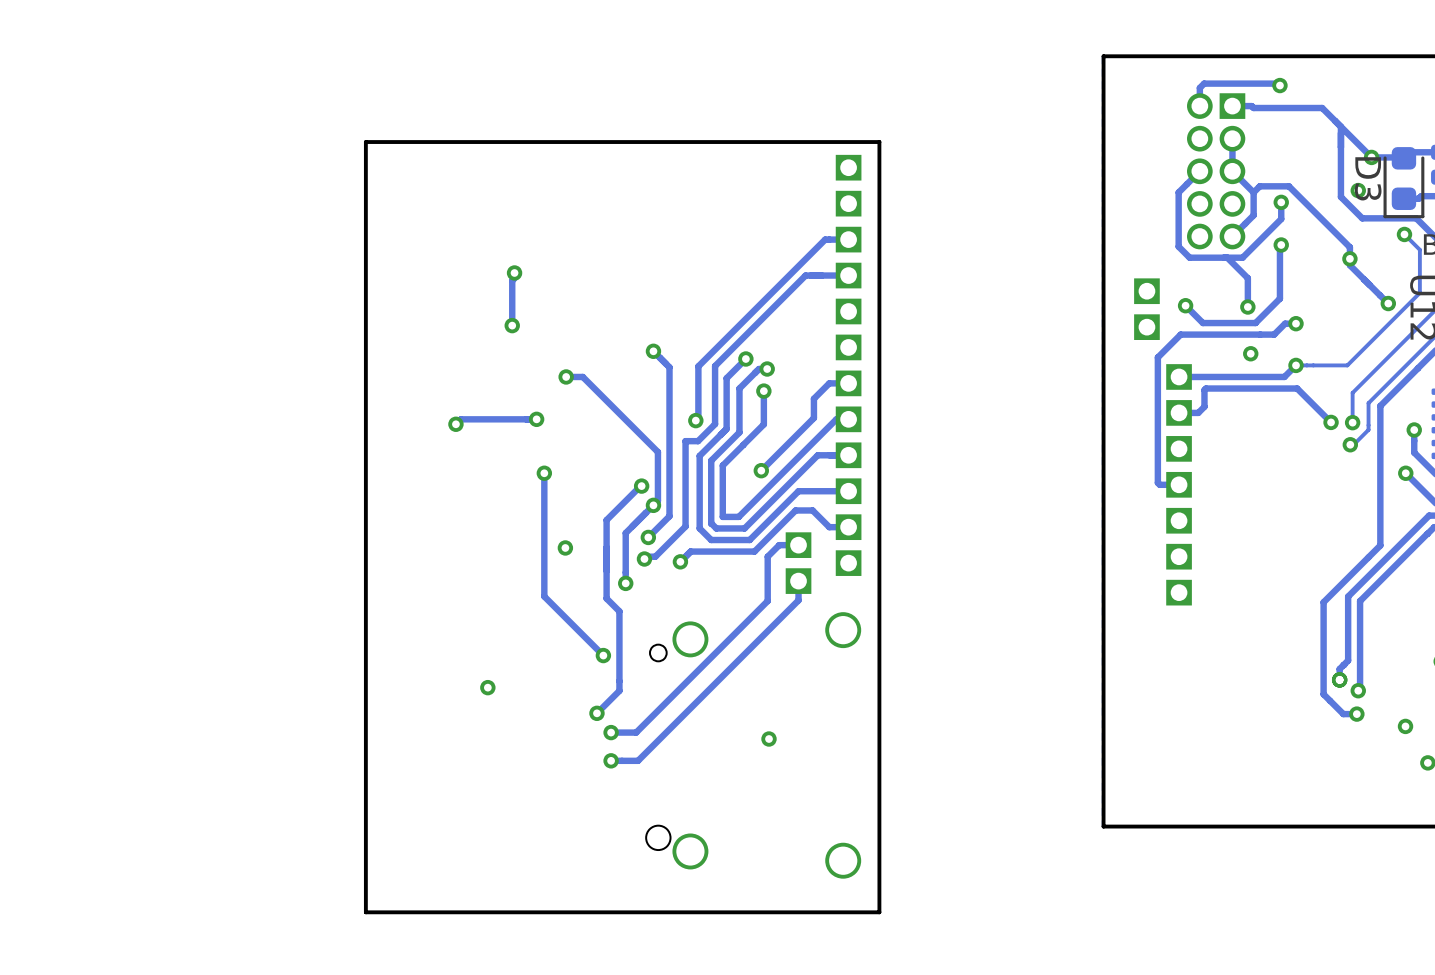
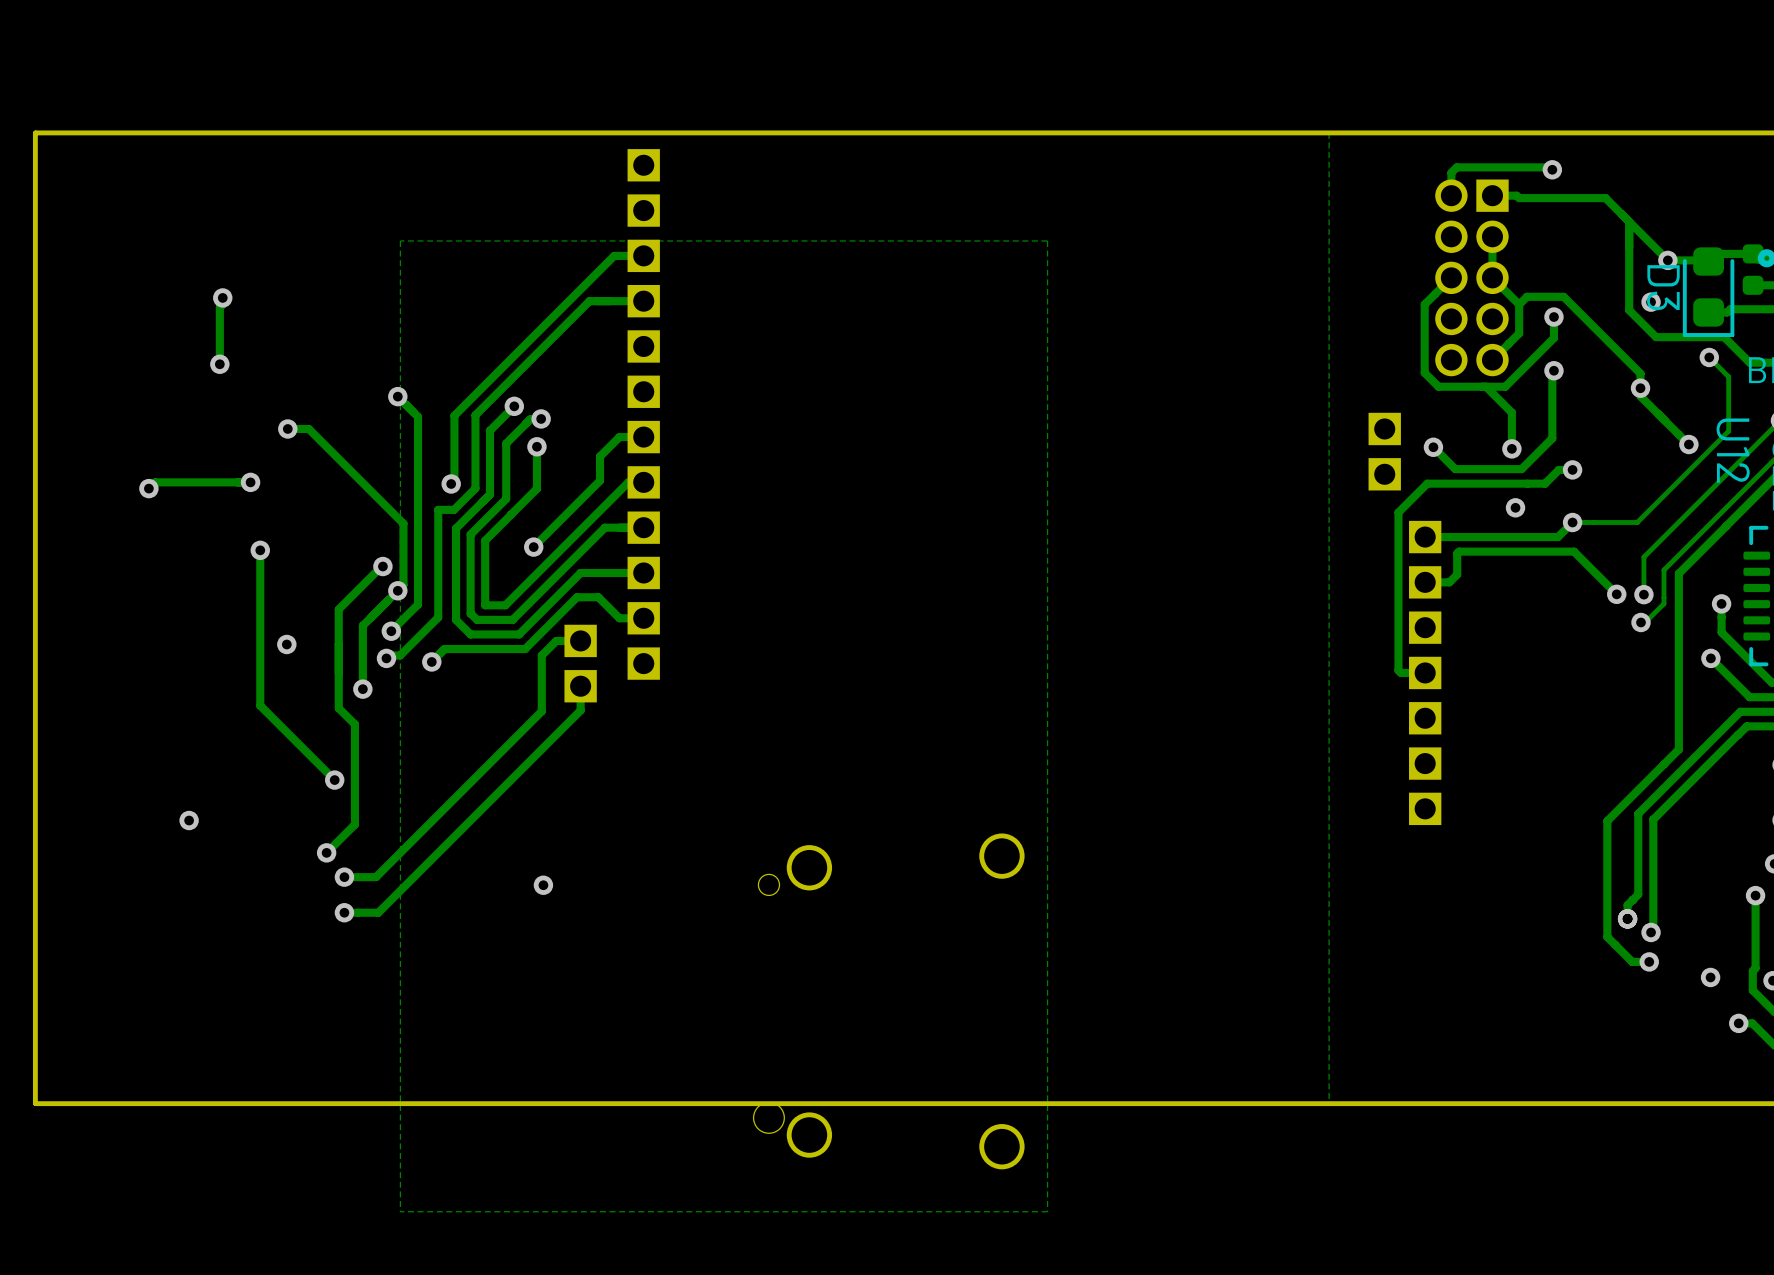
board edge: none -> (35, 132) (35, 1103)
board edge: (1103, 56) (1103, 826) -> (1330, 132) (35, 132)
part: none -> (643, 165)
part: none -> (643, 210)
board edge: (879, 142) (365, 142) (365, 912) (879, 912) (879, 142) -> none
part: none -> (643, 255)
part: (848, 167) -> none
via: none -> (222, 297)
part: none -> (643, 301)
part: (848, 203) -> none
part: none -> (643, 346)
via: none -> (219, 364)
track: (848, 239) (825, 239) (698, 366) (698, 420) -> (643, 255) (614, 255) (454, 415) (454, 483)
part: (848, 239) -> none
part: none -> (643, 391)
via: none -> (397, 396)
via: (514, 272) -> none
via: none -> (514, 406)
track: (518, 274) (512, 280) (512, 325) -> (227, 299) (219, 307) (219, 364)
track: (848, 275) (805, 275) (715, 366) (715, 424) (698, 441) (685, 441) (685, 526) (655, 556) (646, 556) (644, 559) -> (643, 301) (589, 301) (475, 415) (475, 488) (454, 509) (438, 509) (438, 617) (400, 655) (389, 655) (386, 658)
part: (848, 275) -> none
via: none -> (541, 418)
via: none -> (287, 428)
part: none -> (643, 437)
via: none -> (536, 446)
part: (848, 311) -> none
via: (512, 325) -> none
via: none -> (250, 482)
part: none -> (643, 482)
via: none -> (451, 483)
via: none -> (148, 488)
part: (848, 347) -> none
track: (653, 351) (669, 367) (669, 516) (648, 537) -> (397, 396) (418, 416) (418, 604) (391, 631)
via: (653, 351) -> none
track: (745, 358) (726, 378) (726, 428) (699, 455) (699, 528) (711, 540) (749, 540) (798, 491) (848, 491) -> (514, 406) (490, 430) (490, 494) (456, 528) (456, 619) (470, 634) (519, 634) (580, 572) (643, 572)
via: (745, 358) -> none
part: none -> (643, 527)
track: (767, 369) (758, 369) (739, 388) (739, 432) (711, 460) (711, 523) -> (541, 418) (530, 418) (506, 443) (506, 498) (470, 534) (470, 613)
via: (767, 369) -> none
track: (566, 376) (582, 376) (657, 452) (657, 500) (625, 533) (625, 583) -> (287, 428) (308, 428) (403, 523) (403, 585) (362, 625) (362, 689)
via: (566, 376) -> none
track: (848, 383) (829, 383) (813, 398) (813, 418) (761, 470) -> (643, 437) (619, 437) (600, 456) (600, 480) (533, 547)
part: (848, 383) -> none
via: none -> (533, 547)
via: none -> (260, 550)
track: (763, 391) (763, 424) (722, 465) (722, 516) (738, 516) (836, 419) (848, 419) -> (536, 446) (536, 488) (485, 540) (485, 605) (505, 605) (628, 482) (643, 482)
via: (763, 391) -> none
via: none -> (382, 566)
part: none -> (643, 572)
via: none -> (397, 590)
track: (536, 419) (460, 419) (455, 424) -> (250, 482) (155, 482) (148, 488)
via: (536, 419) -> none
part: (848, 419) -> none
via: (695, 420) -> none
via: (455, 424) -> none
part: none -> (643, 618)
via: none -> (391, 631)
track: (848, 455) (817, 455) (744, 528) (716, 528) (711, 523) -> (643, 527) (604, 527) (512, 619) (477, 619) (471, 613)
part: (848, 455) -> none
part: none -> (580, 640)
via: none -> (286, 644)
via: (761, 470) -> none
via: none -> (386, 658)
track: (544, 473) (544, 596) (603, 655) -> (260, 550) (260, 705) (334, 780)
via: (544, 473) -> none
via: none -> (431, 661)
part: none -> (643, 663)
track: (640, 486) (606, 520) (606, 598) (619, 611) (619, 690) (596, 713) -> (381, 566) (338, 609) (338, 708) (354, 724) (354, 824) (326, 852)
via: (641, 486) -> none
part: (848, 491) -> none
part: none -> (580, 686)
via: none -> (362, 689)
via: (653, 505) -> none
track: (848, 527) (829, 527) (812, 510) (795, 510) (754, 551) (690, 551) (680, 561) -> (643, 618) (619, 618) (598, 597) (576, 597) (525, 649) (444, 649) (431, 661)
part: (848, 527) -> none
via: (648, 537) -> none
track: (798, 545) (779, 545) (767, 556) (767, 601) (636, 732) (611, 732) -> (580, 640) (556, 640) (541, 655) (541, 711) (376, 877) (344, 877)
part: (798, 545) -> none
via: (565, 547) -> none
via: (644, 559) -> none
via: (680, 561) -> none
part: (848, 563) -> none
via: none -> (334, 780)
track: (798, 581) (798, 600) (638, 760) (611, 760) -> (580, 686) (580, 710) (378, 912) (344, 912)
part: (798, 581) -> none
via: (625, 583) -> none
via: none -> (189, 820)
via: none -> (326, 852)
via: none -> (344, 877)
via: (603, 655) -> none
via: none -> (344, 912)
via position: (487, 687) -> (543, 885)
via: (596, 713) -> none
via: (611, 732) -> none
via: (769, 739) -> none
via: (611, 760) -> none
board edge: none -> (1330, 1103) (35, 1103)

